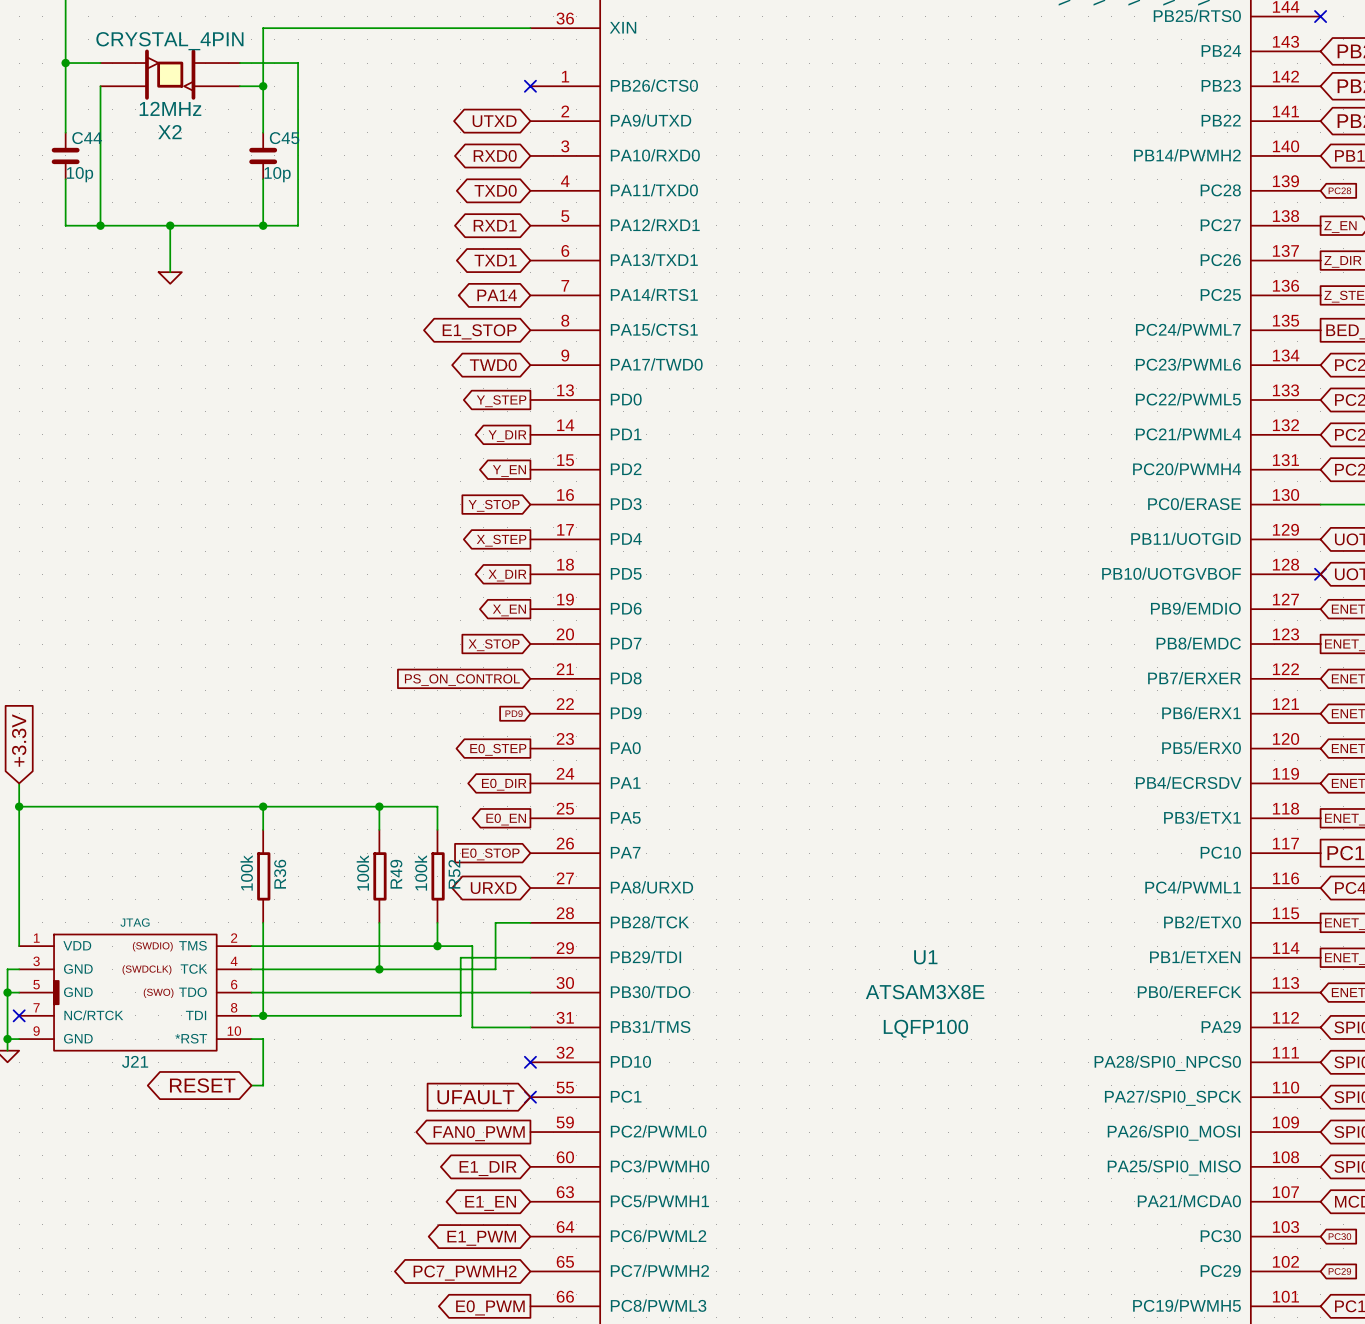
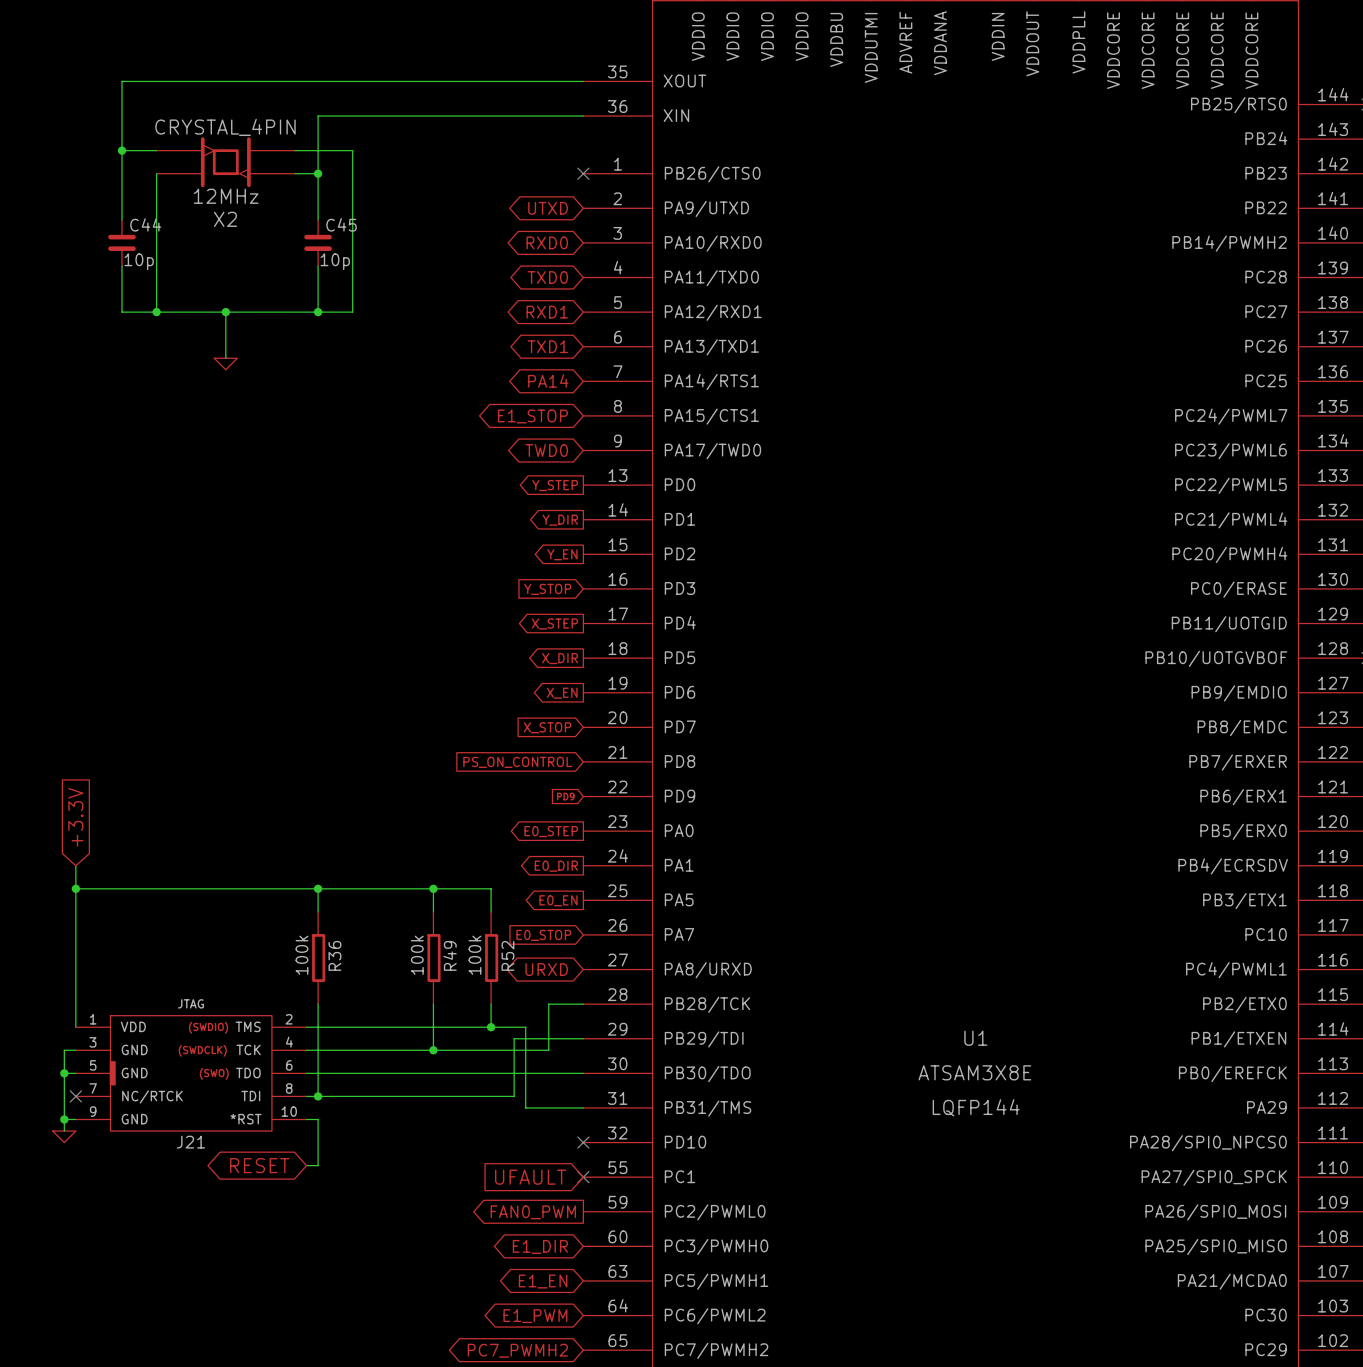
U1 text: LQFP100 (925, 1028) -> LQFP144 (976, 1107)

